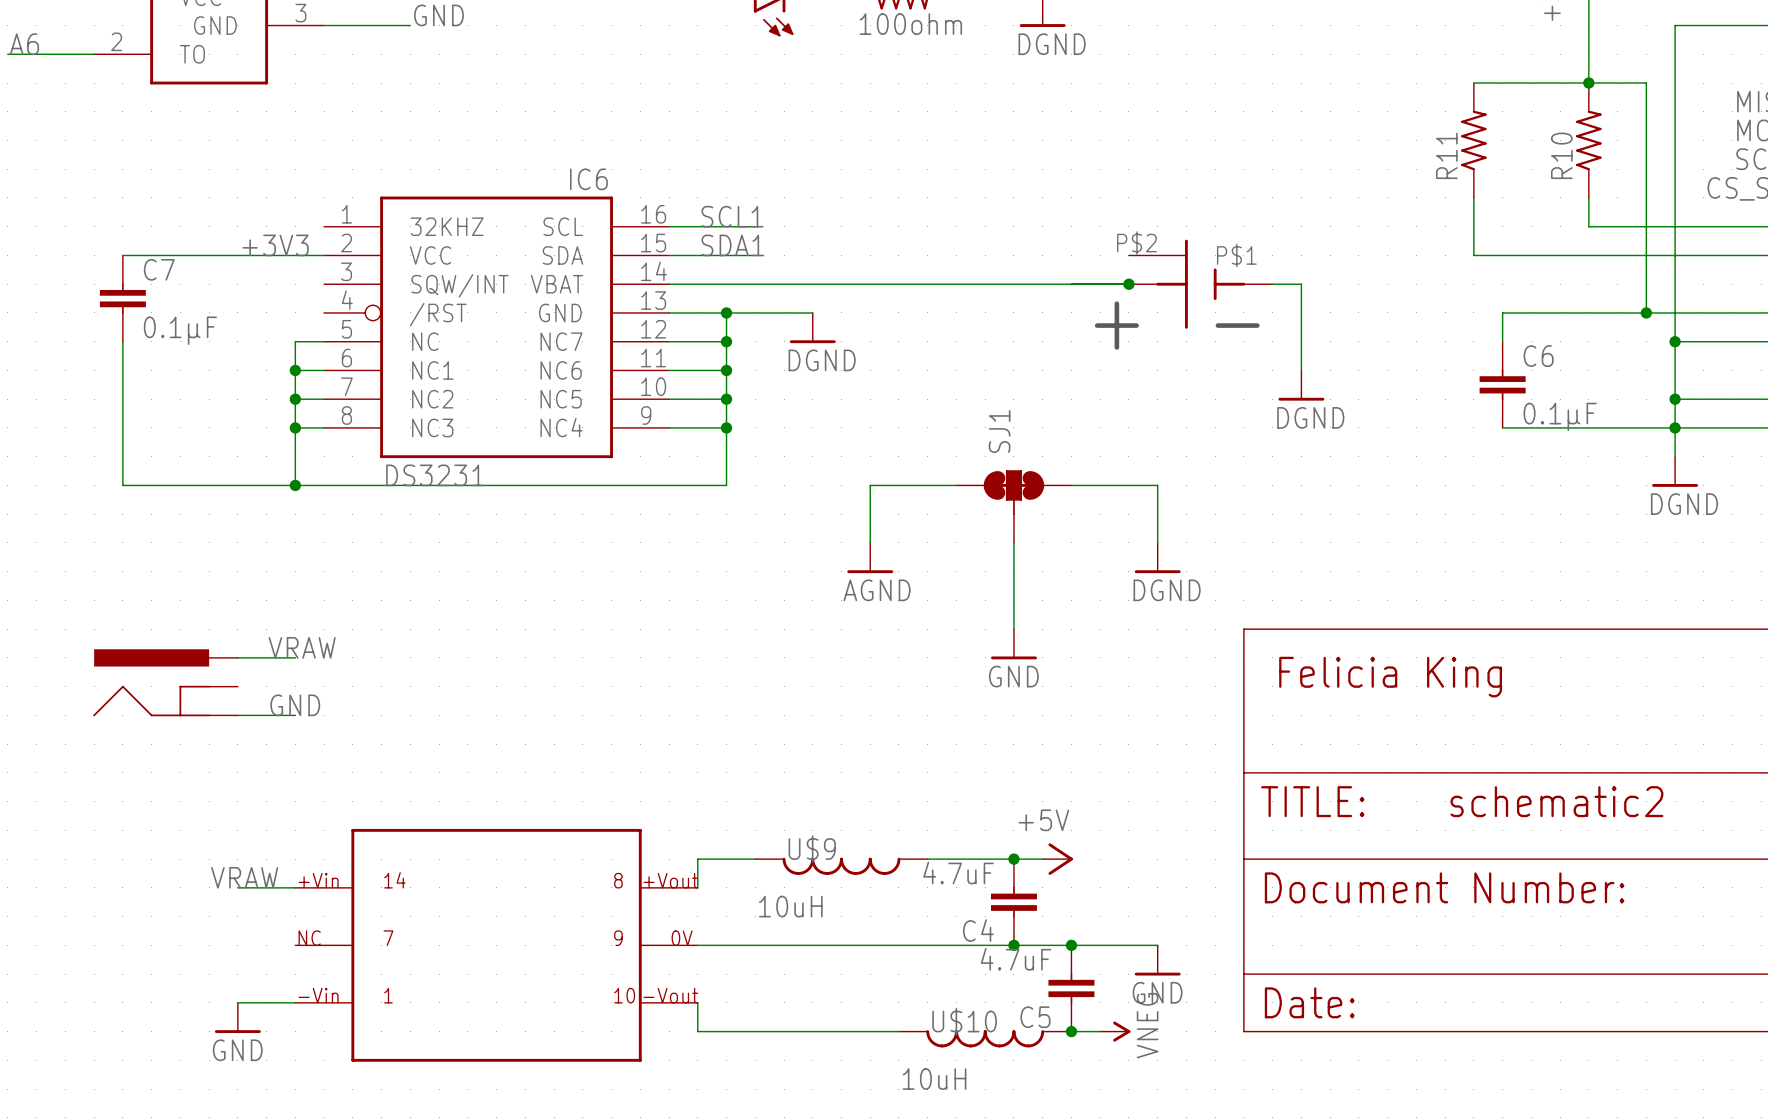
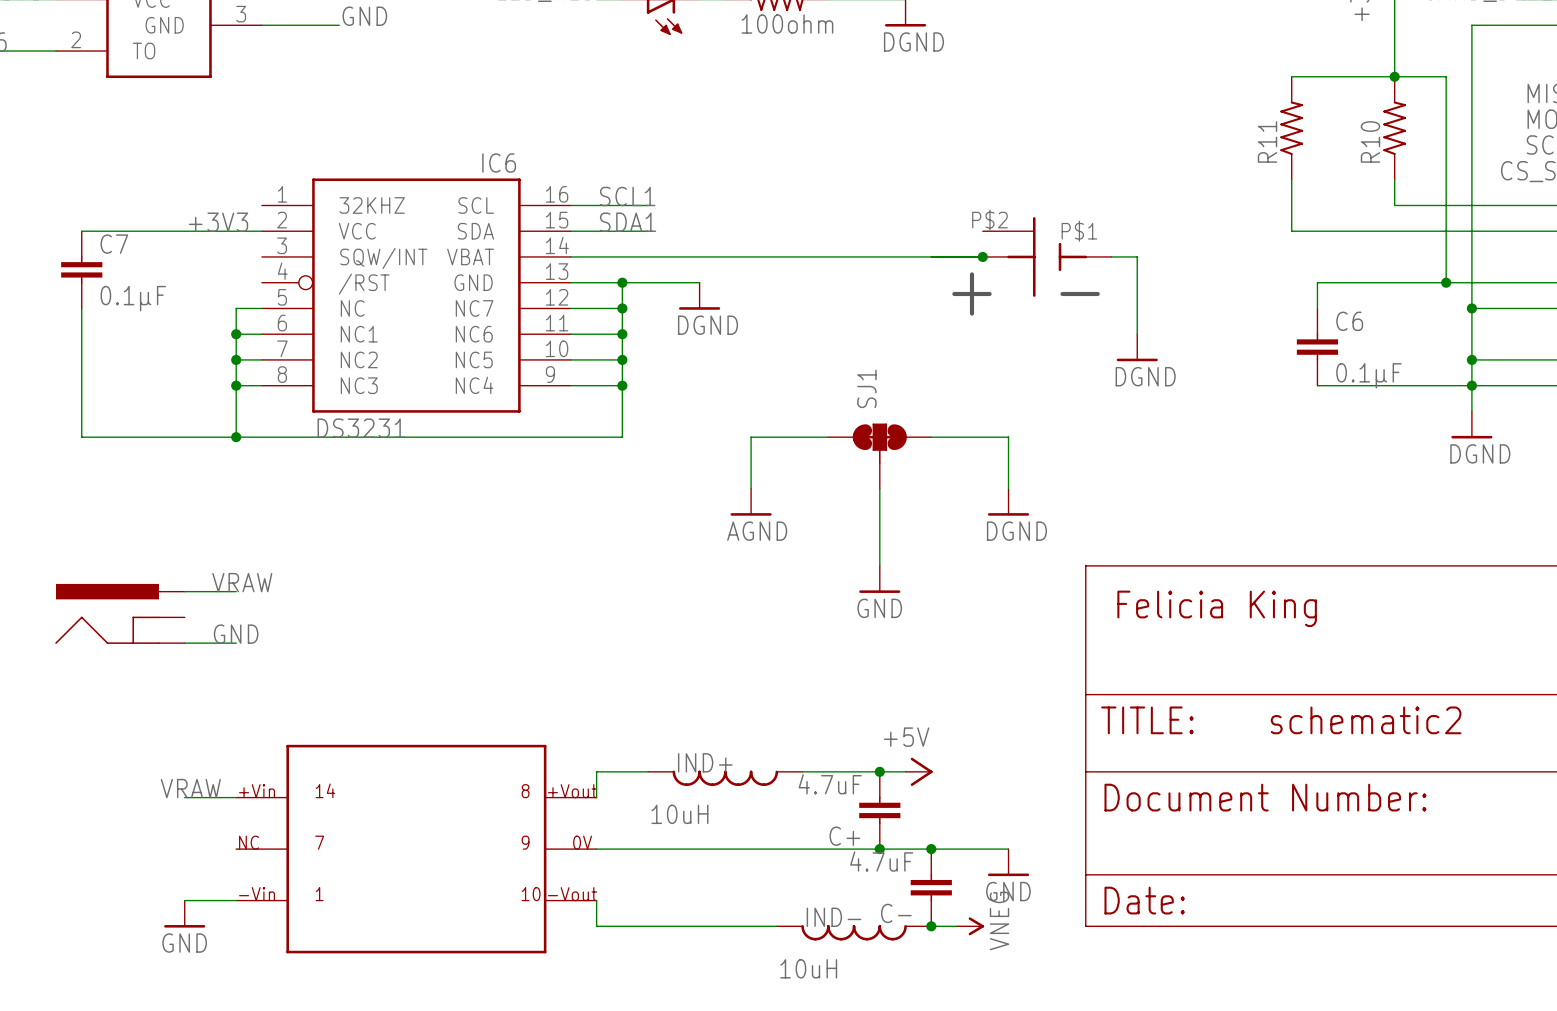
U$9 name: U$9 (812, 849) -> IND+ (705, 762)
C4 name: C4 (978, 930) -> C+ (844, 836)
C5 name: C5 (1035, 1017) -> C- (896, 913)
U$10 name: U$10 (964, 1021) -> IND- (834, 917)

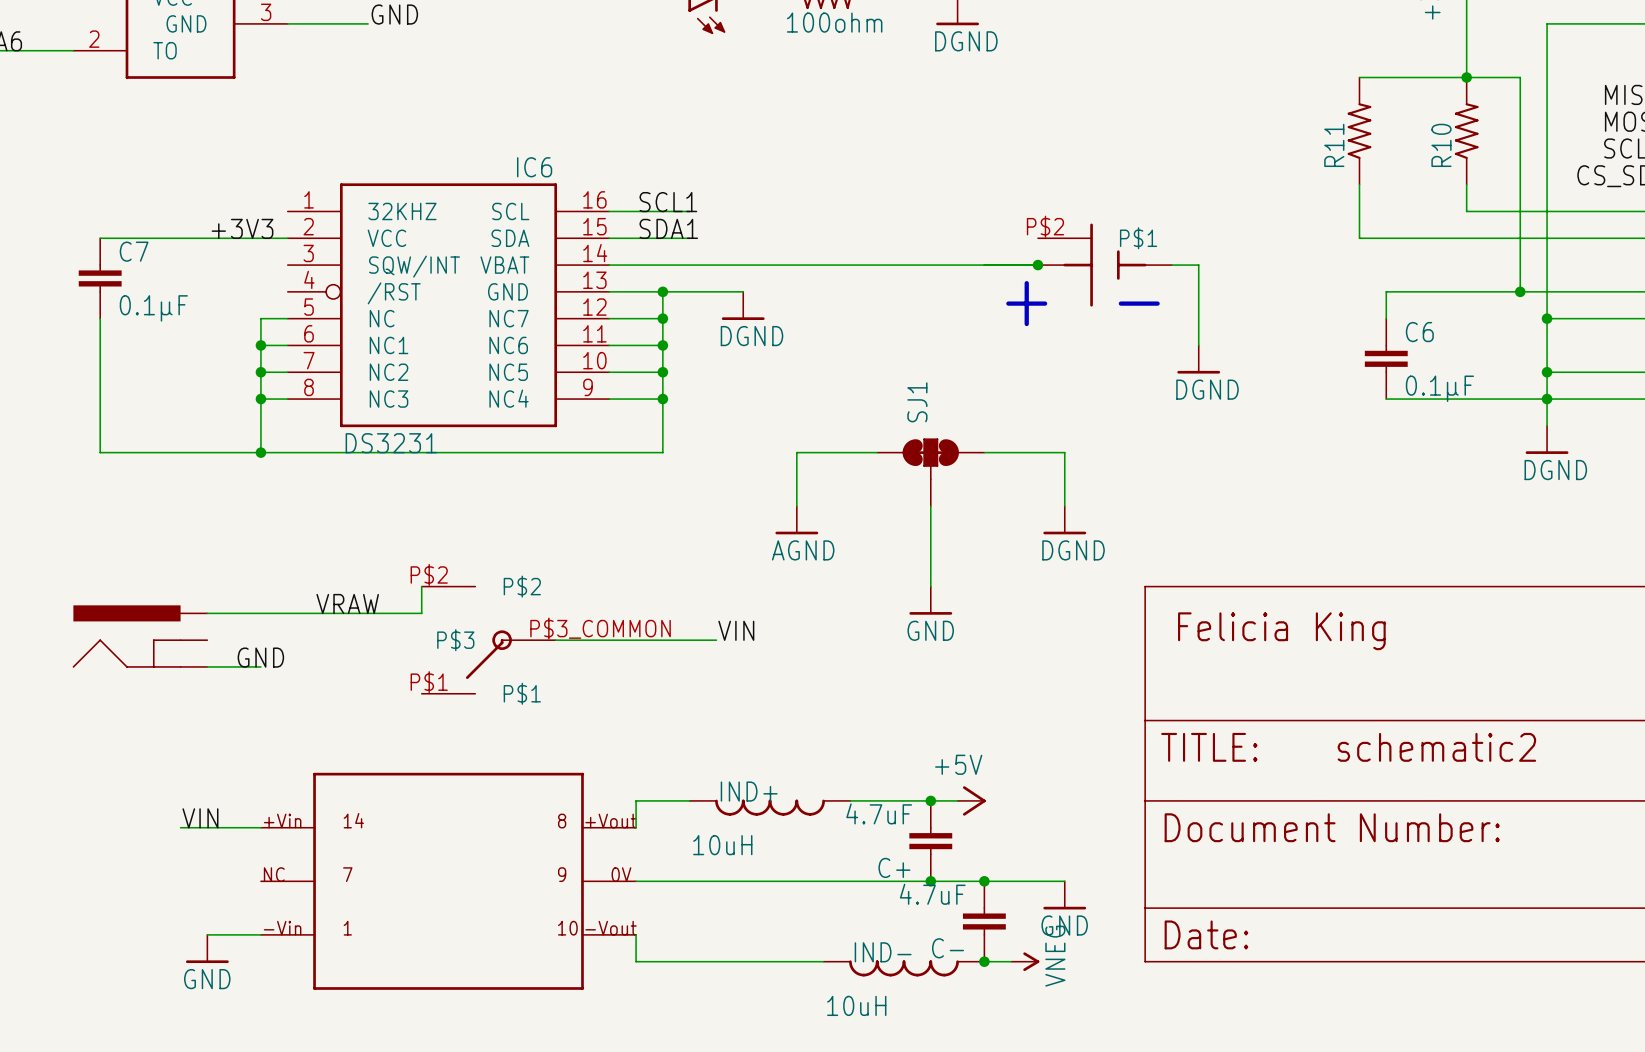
wire: none -> (421, 586) (421, 613) (260, 613)
label position: VRAW (242, 582) -> VRAW (347, 604)
label: none -> VIN (736, 630)
part: none -> (488, 640)
wire: none -> (555, 640) (716, 640)
label: VRAW (190, 788) -> VIN (200, 818)
wire: none -> (180, 827) (207, 827)

